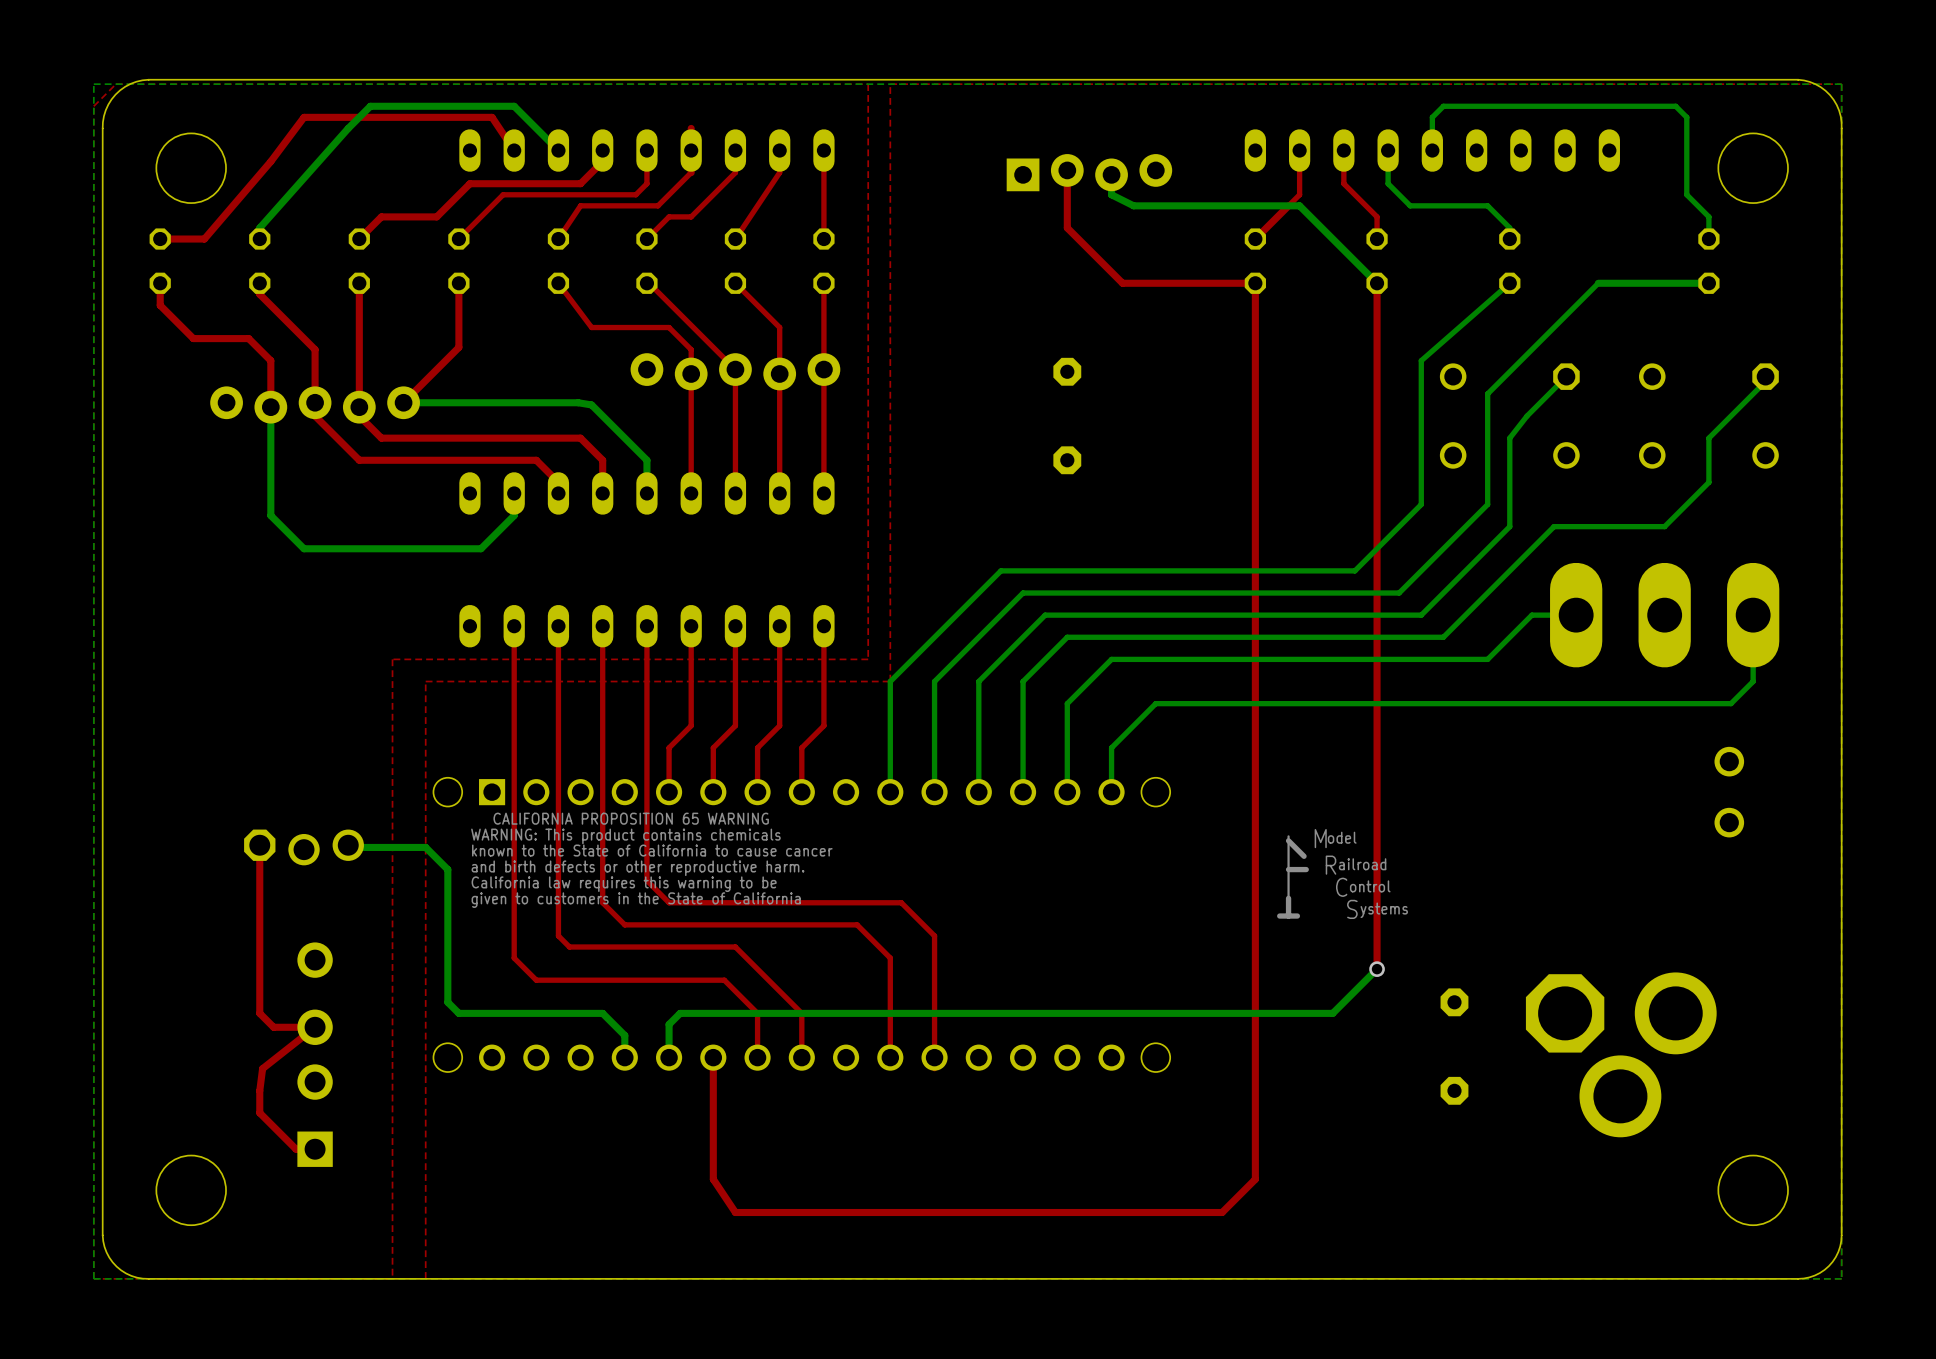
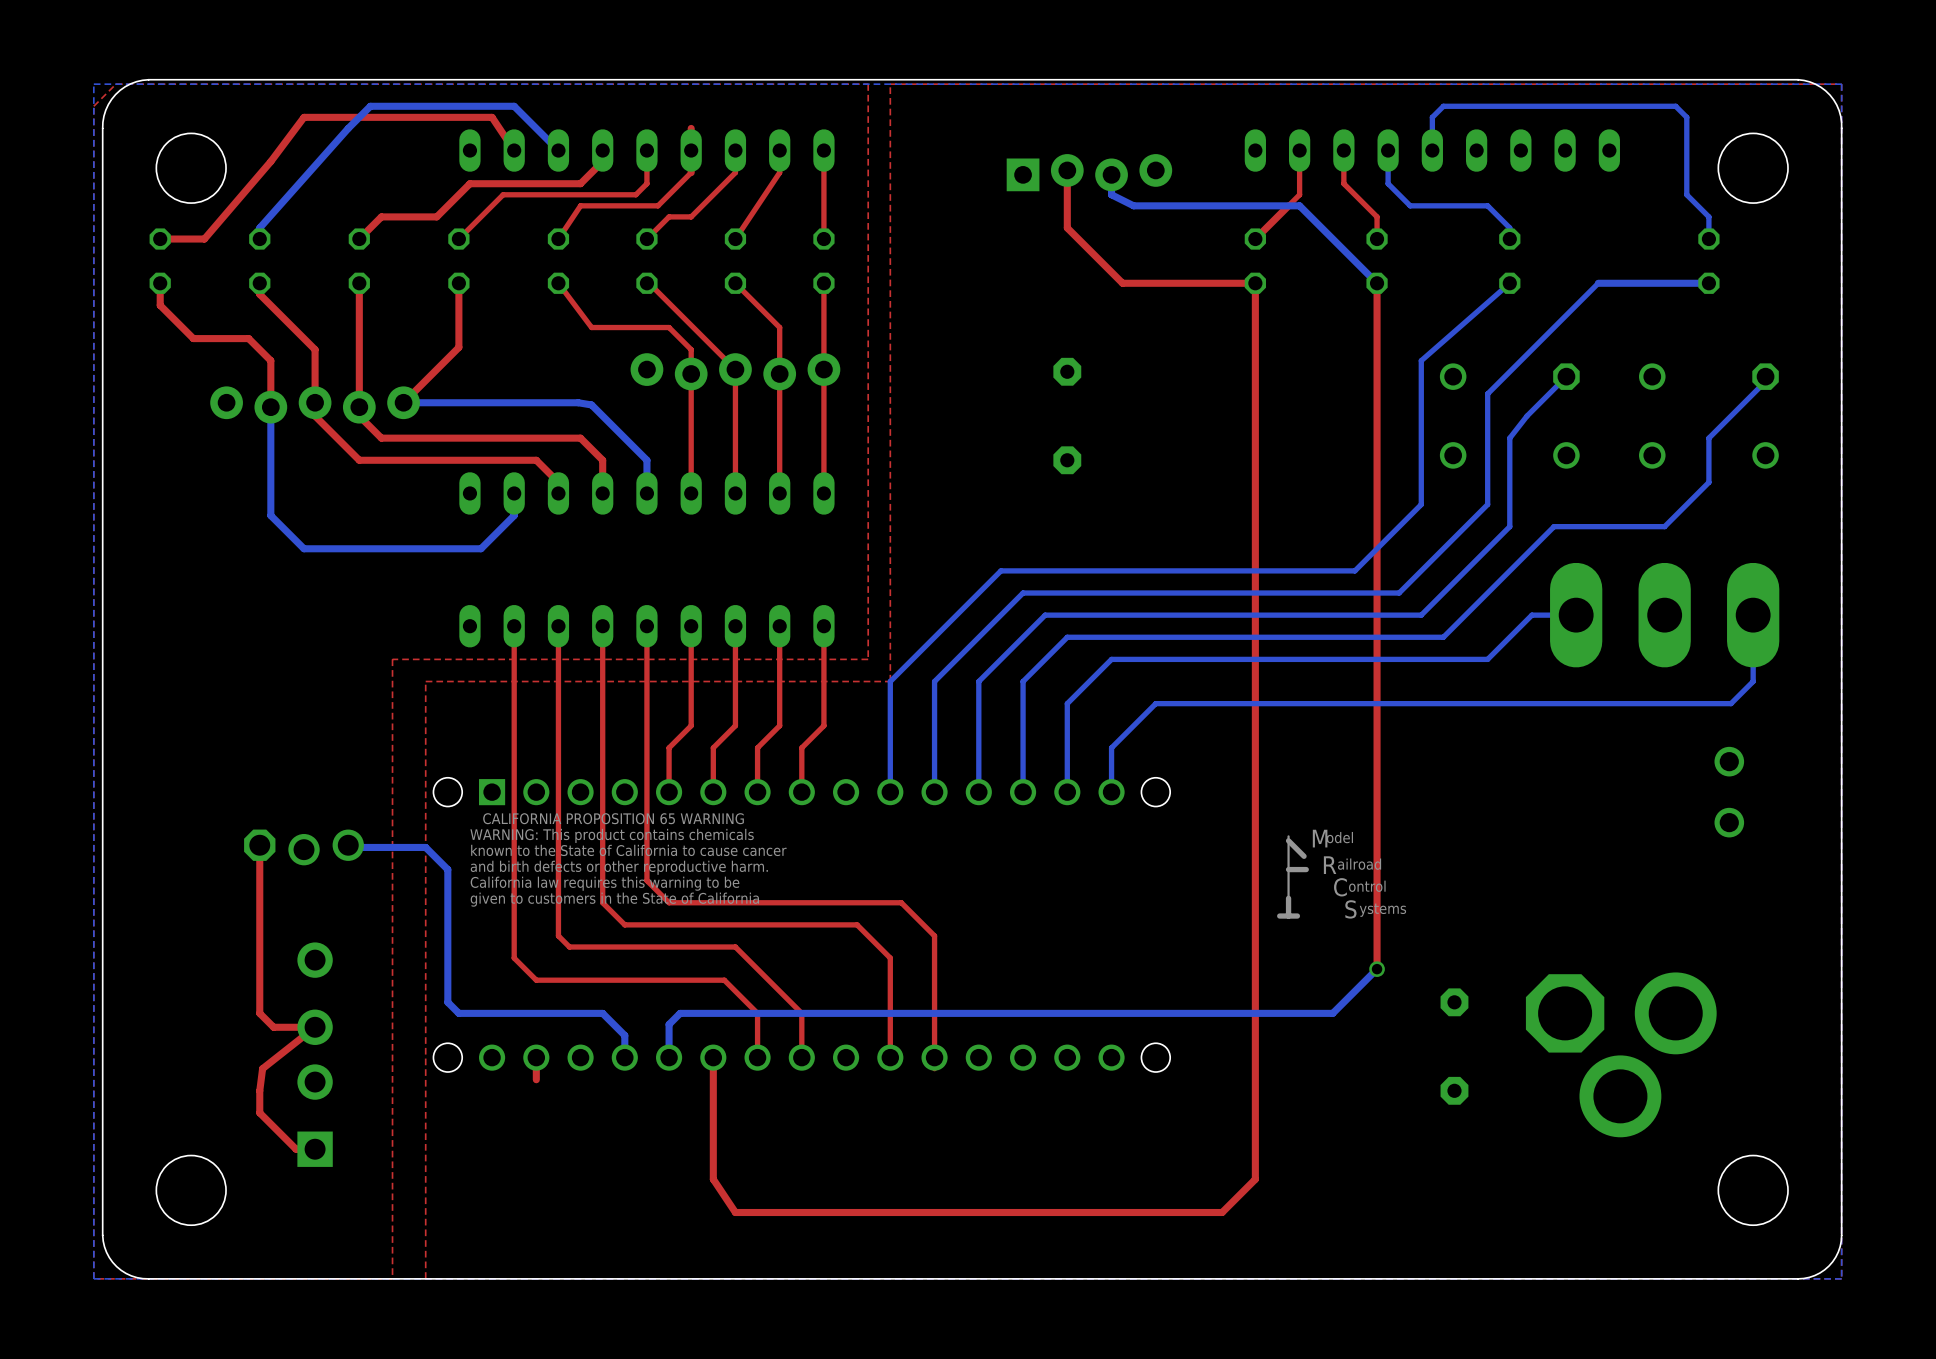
top track: none -> (536, 1057) (536, 1079)

